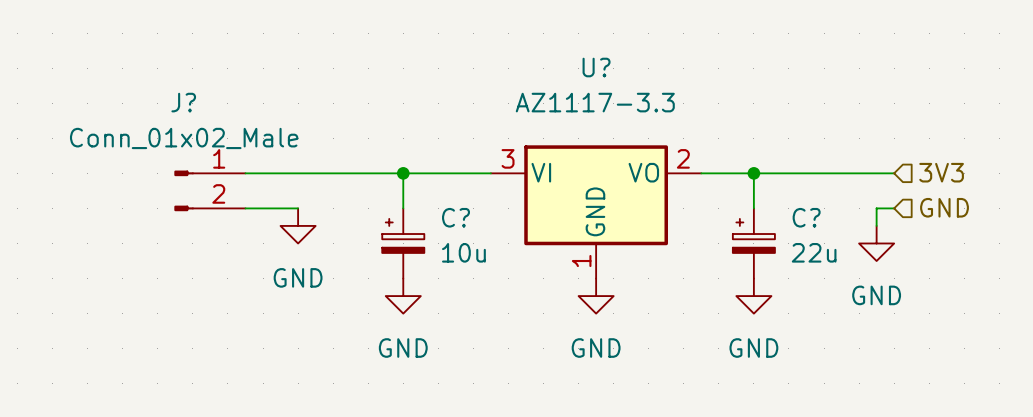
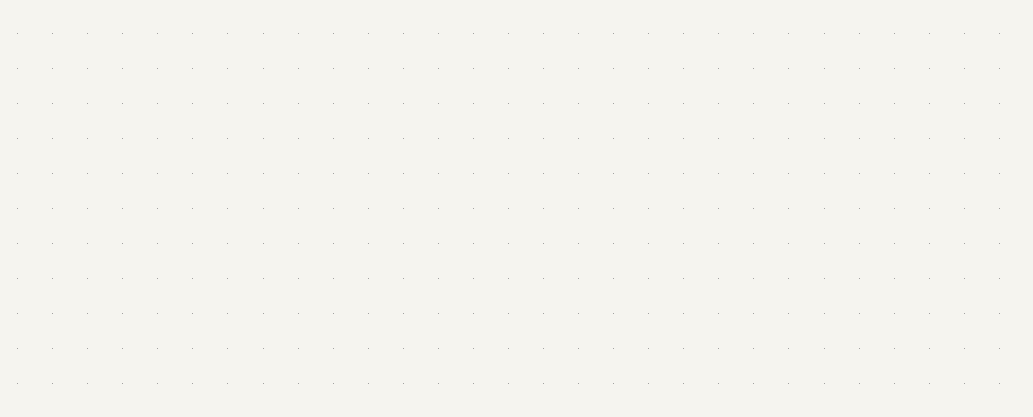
hierarchical label: 3V3 (941, 172) -> none
wire: (245, 173) (490, 173) -> none
wire: (403, 173) (403, 208) -> none
junction: (403, 173) -> none
wire: (701, 173) (894, 173) -> none
wire: (753, 173) (753, 208) -> none
junction: (753, 173) -> none
J?: Conn_01x02_Male (209, 190) -> none
hierarchical label: GND (944, 207) -> none
wire: (245, 208) (298, 208) -> none
wire: (894, 208) (876, 208) (876, 225) -> none
U?: AZ1117-3.3 (596, 211) -> none
power symbol: GND (298, 225) -> none
C?: 10u (403, 243) -> none
C?: 22u (753, 243) -> none
power symbol: GND (876, 243) -> none
power symbol: GND (403, 296) -> none
power symbol: GND (596, 296) -> none
power symbol: GND (753, 296) -> none

